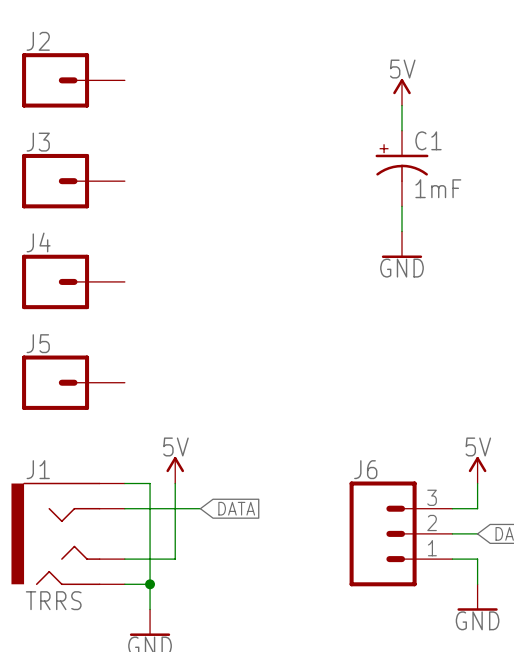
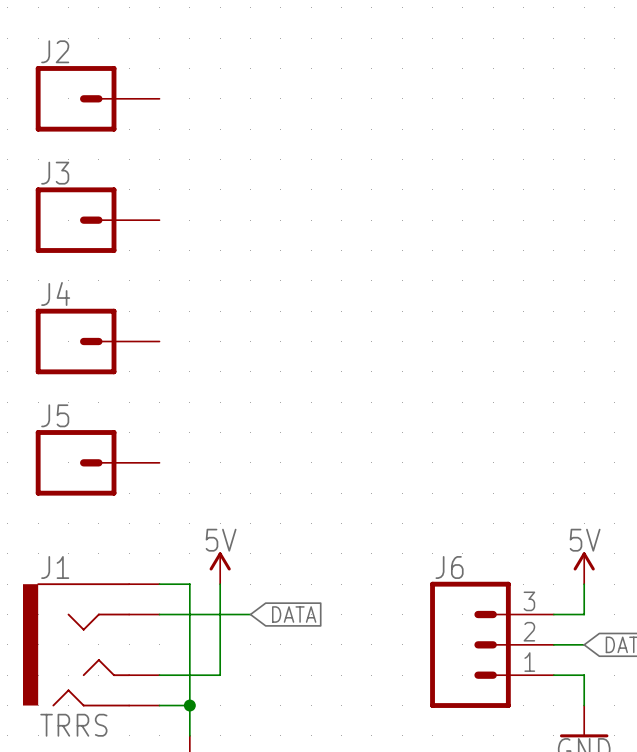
power symbol: 5V (402, 92) -> none
wire: (402, 105) (402, 130) -> none
C1: 1mF (402, 168) -> none
wire: (402, 206) (402, 231) -> none
power symbol: GND (402, 244) -> none

